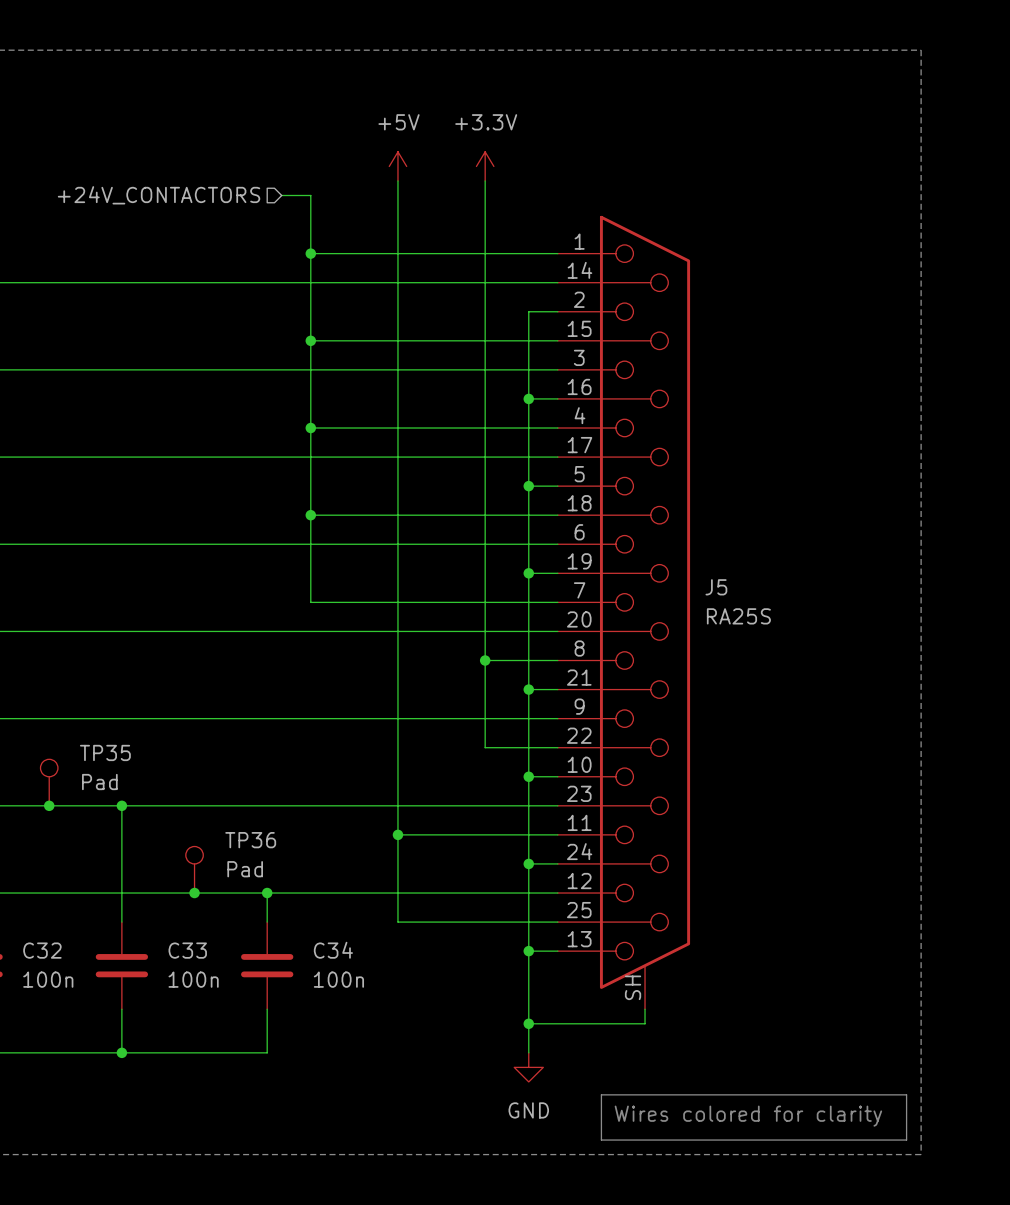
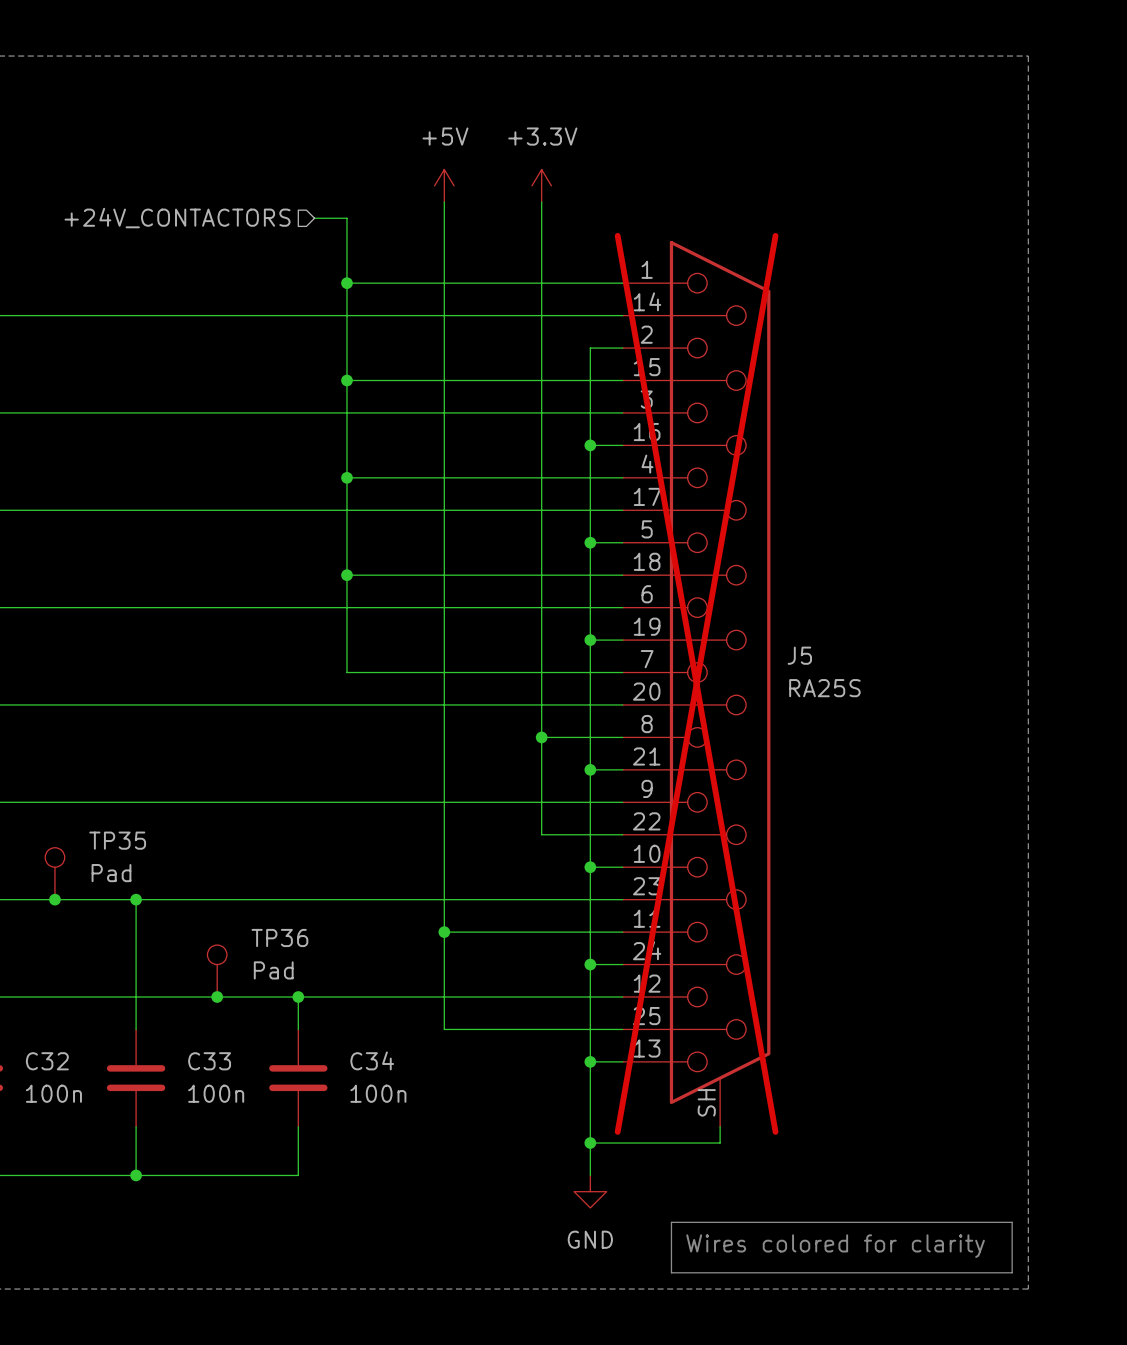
J5 do-not-place cross: none -> (696, 683)

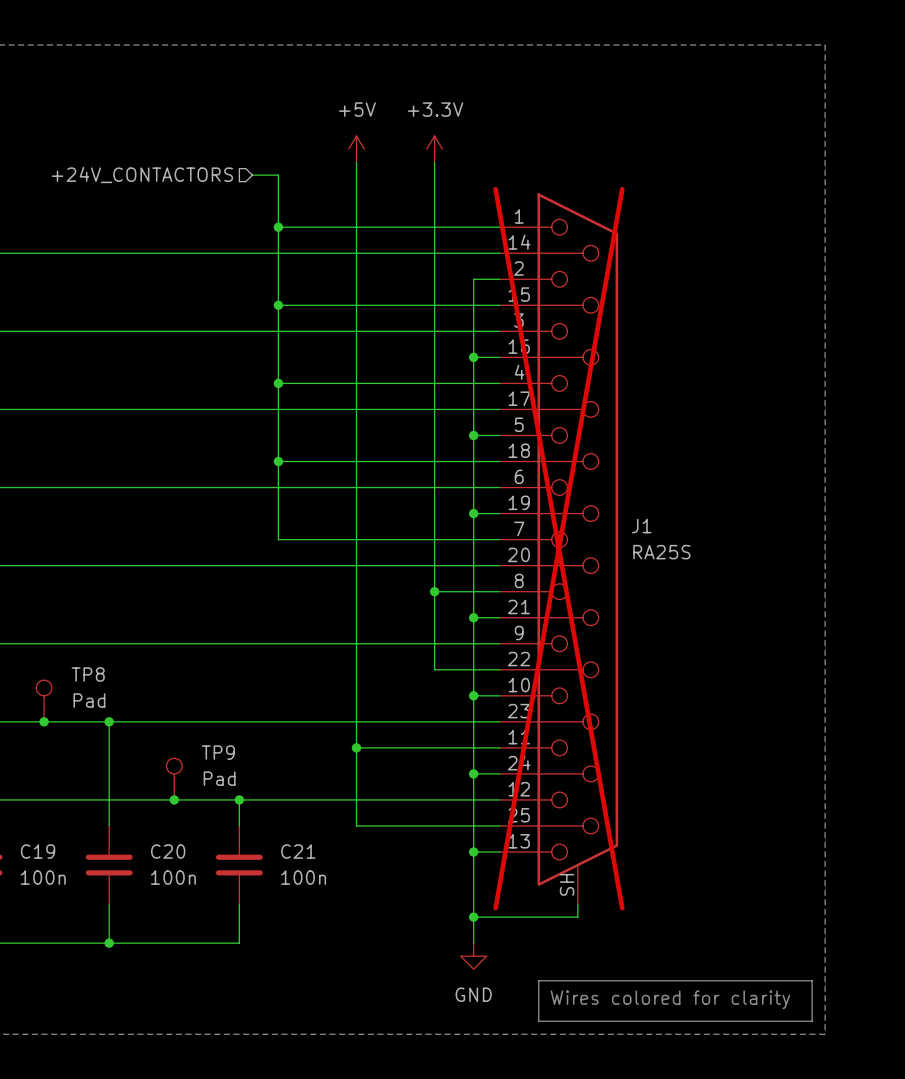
J5 name: J5 (799, 655) -> J1 (641, 526)
TP35 name: TP35 (117, 840) -> TP8 (88, 674)
TP36 name: TP36 (279, 937) -> TP9 (218, 752)
C34 name: C34 (372, 1060) -> C21 (298, 851)
C32 name: C32 (47, 1061) -> C19 (38, 851)
C33 name: C33 (209, 1061) -> C20 (168, 851)

